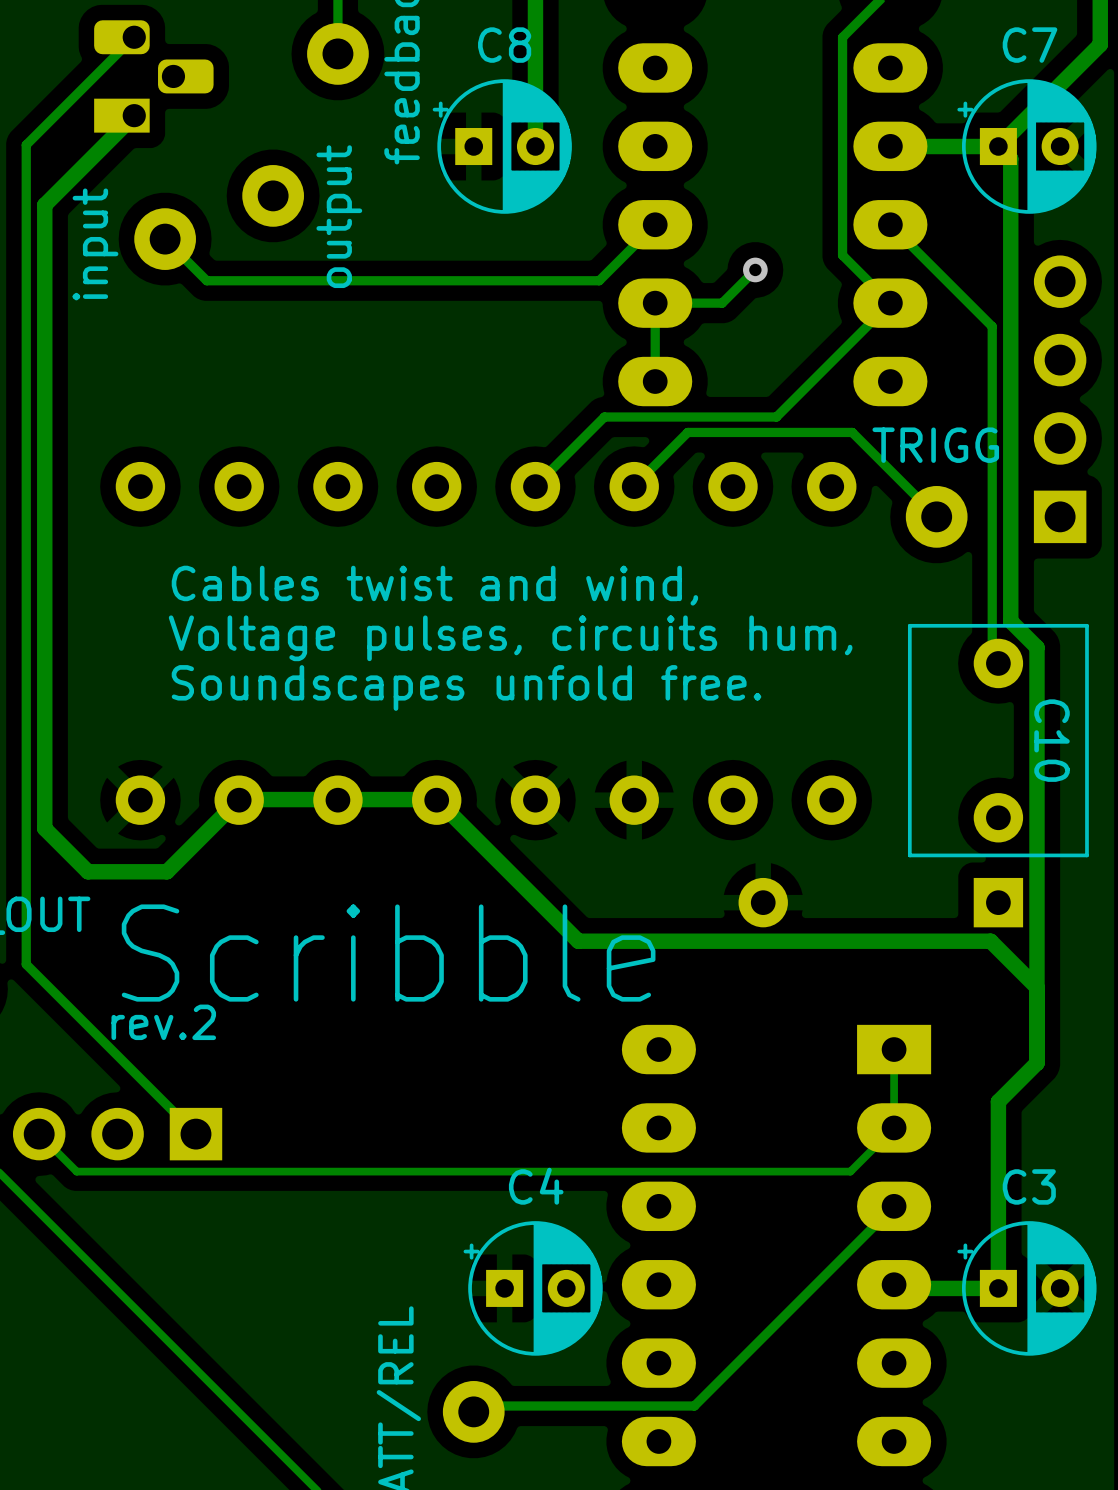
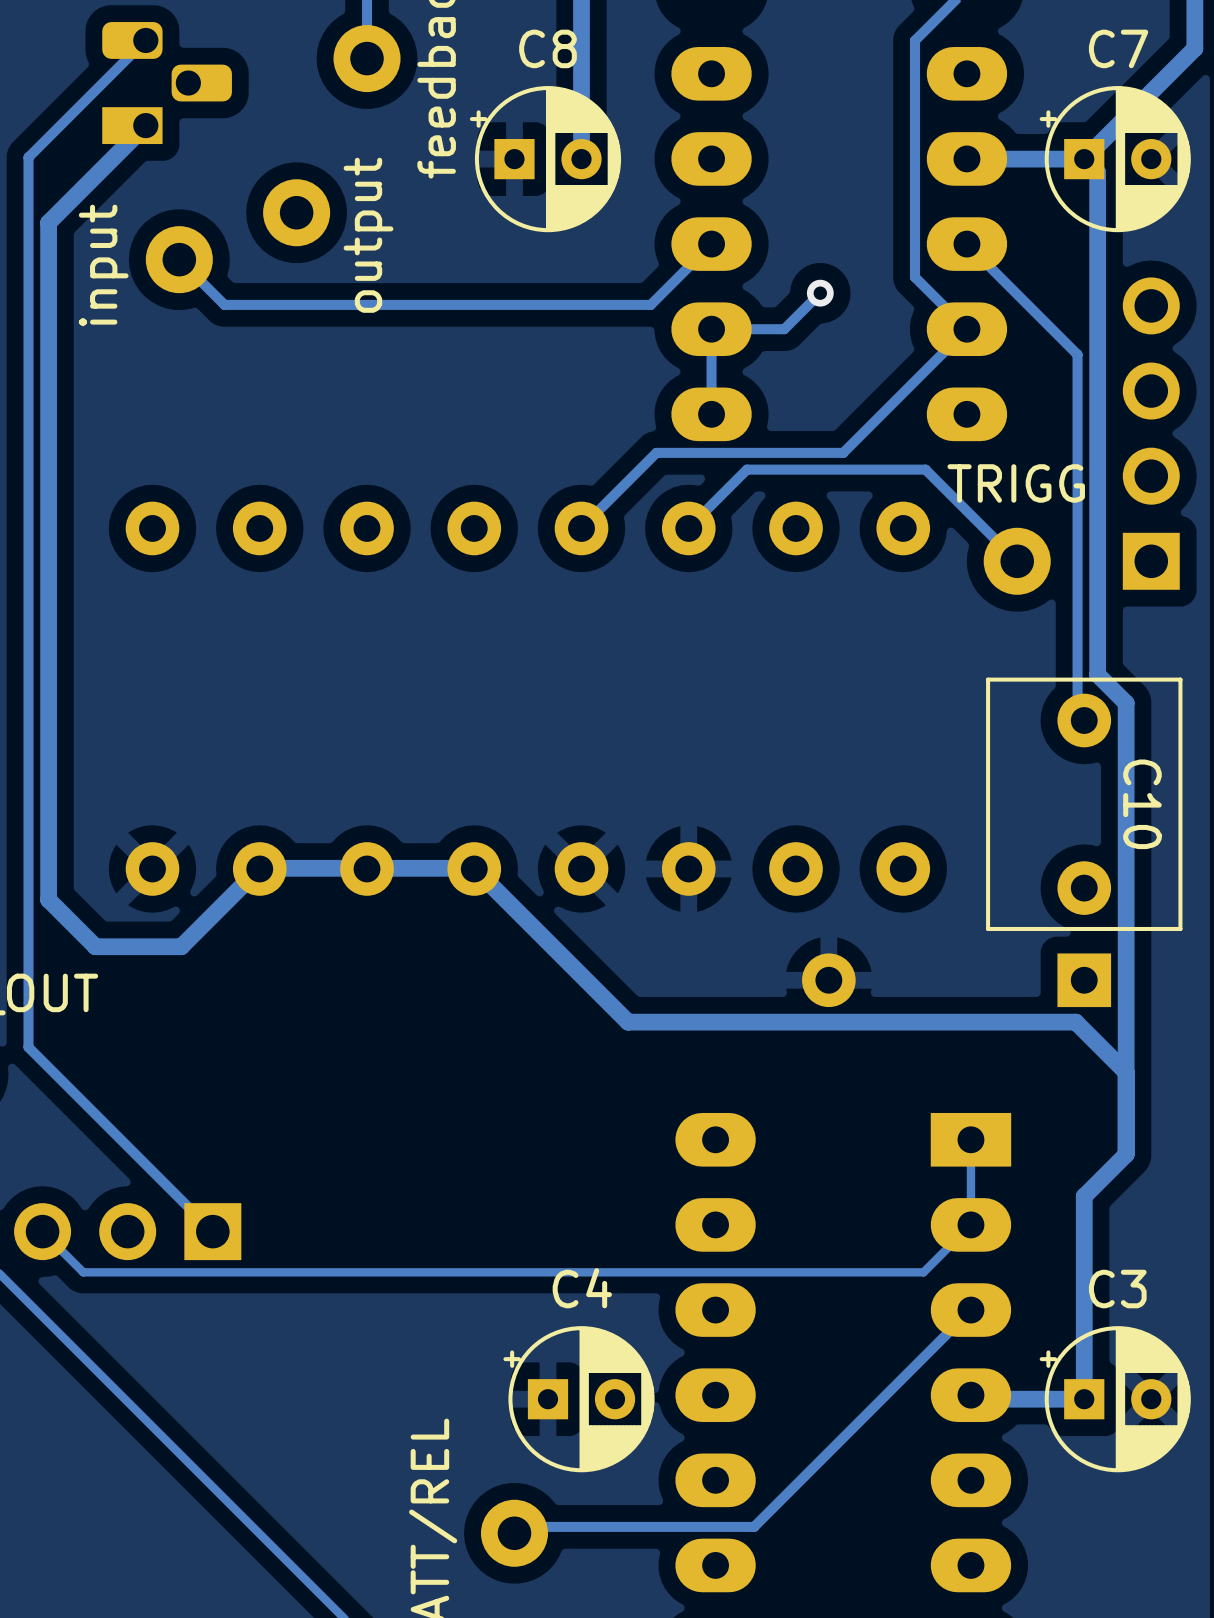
text: Cables twist and wind, (434, 585) -> none
text: Voltage pulses, circuits hum, (510, 638) -> none
text: Soundscapes unfold free. (466, 687) -> none
text: Scribble (388, 953) -> none
text: rev.2 (163, 1022) -> none

